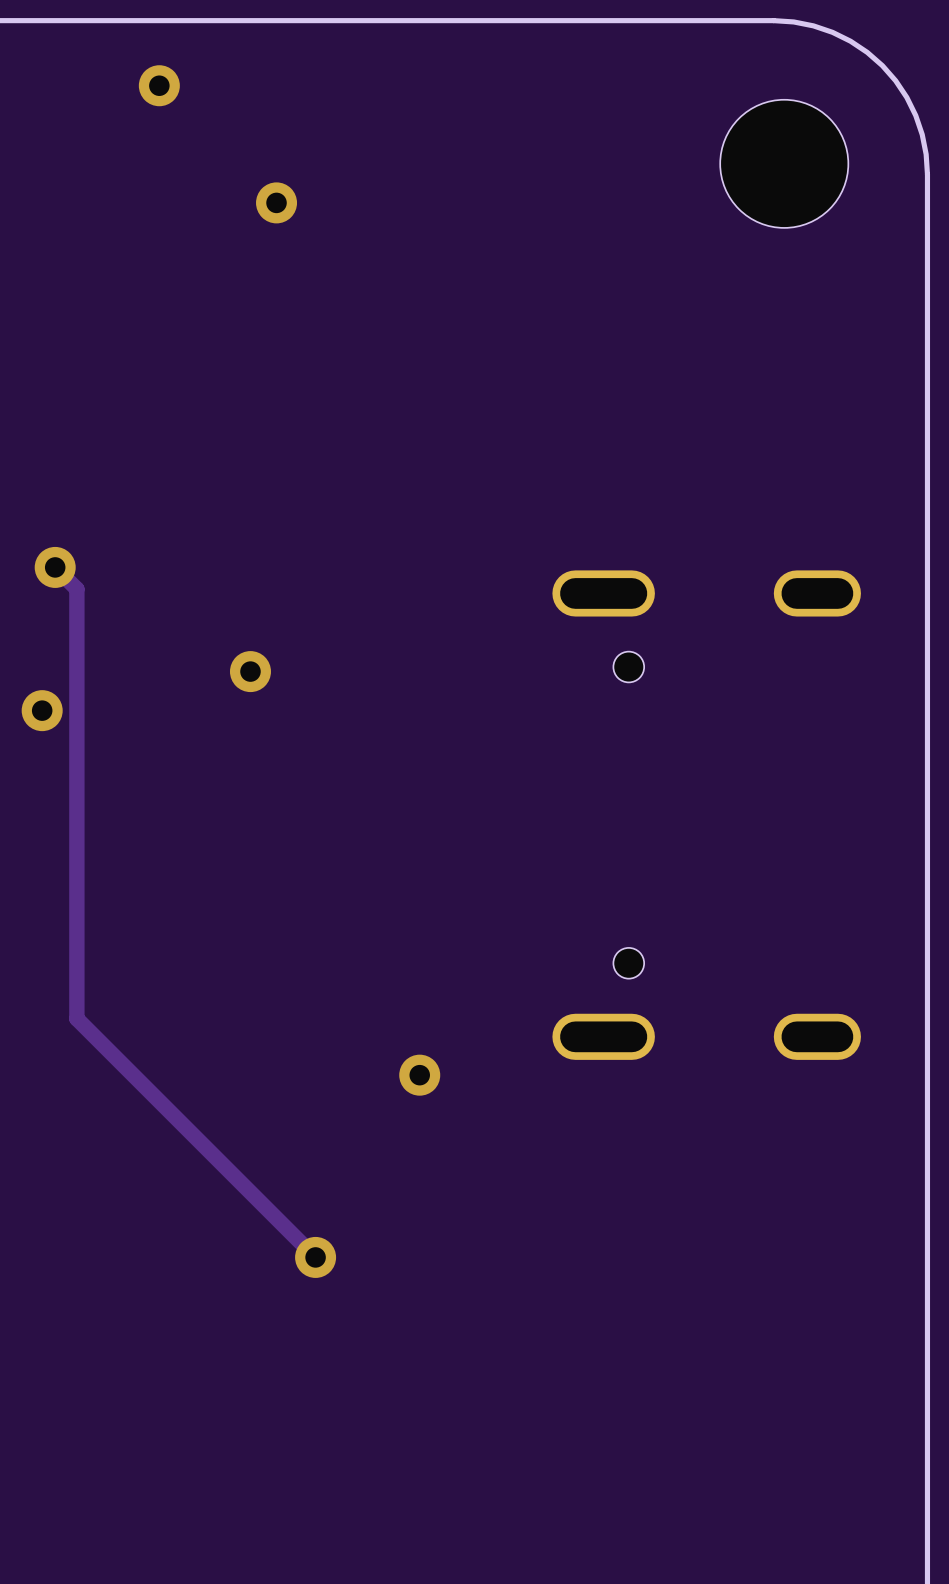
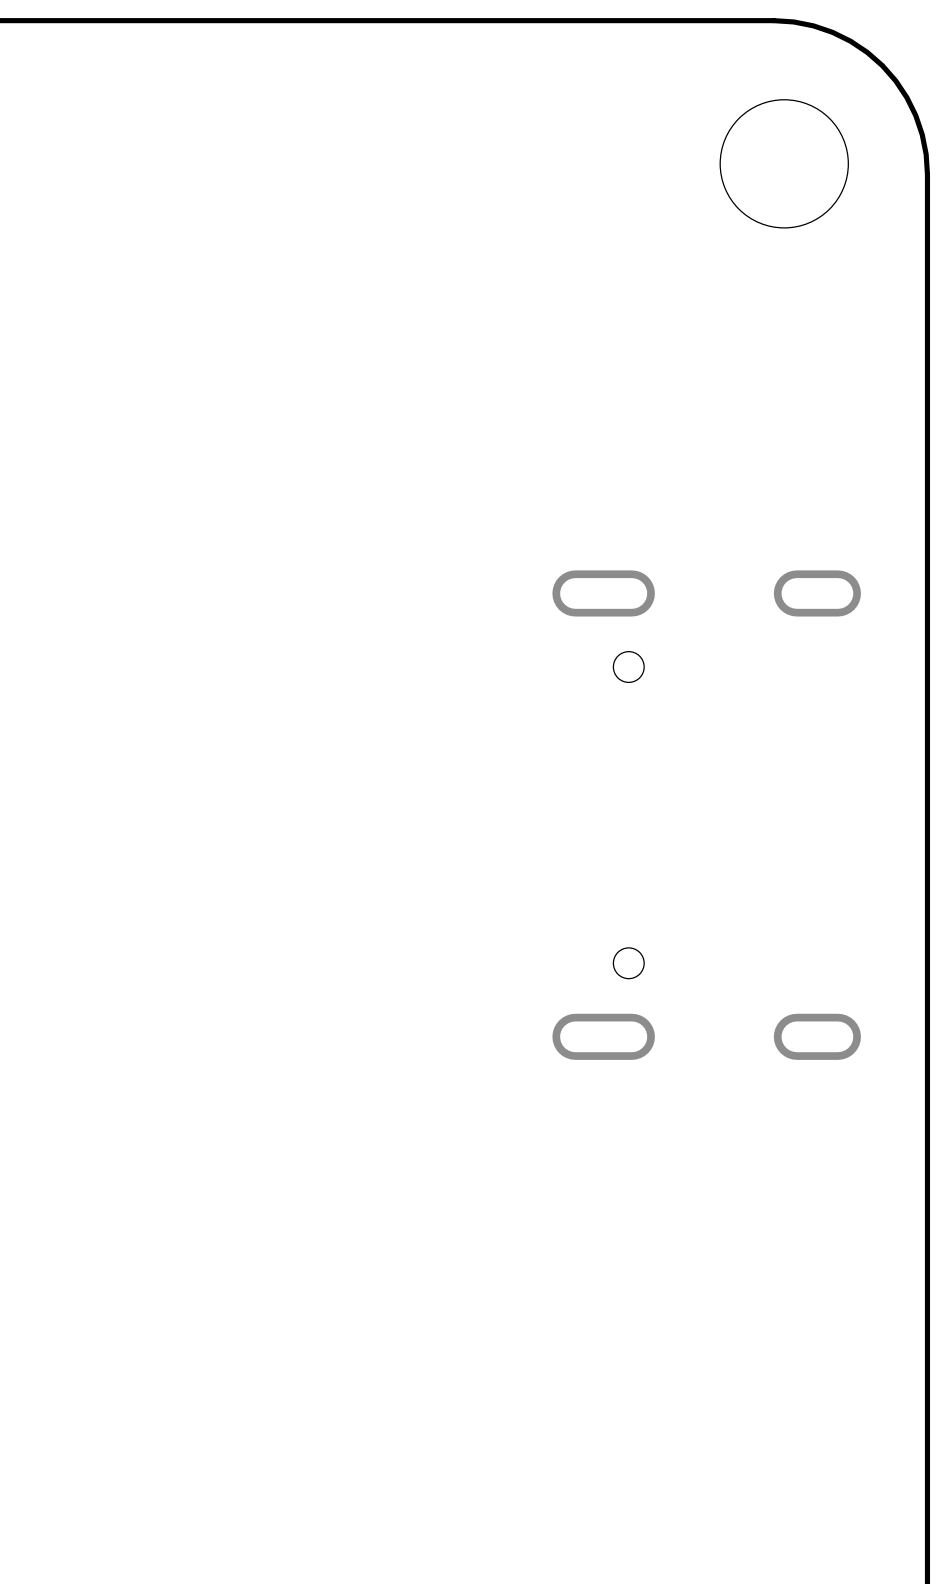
via: (159, 85) -> none
via: (276, 202) -> none
track: (55, 567) (76, 589) (76, 1018) (315, 1257) -> none
via: (55, 567) -> none
via: (250, 671) -> none
via: (42, 710) -> none
via: (419, 1075) -> none
via: (315, 1257) -> none

